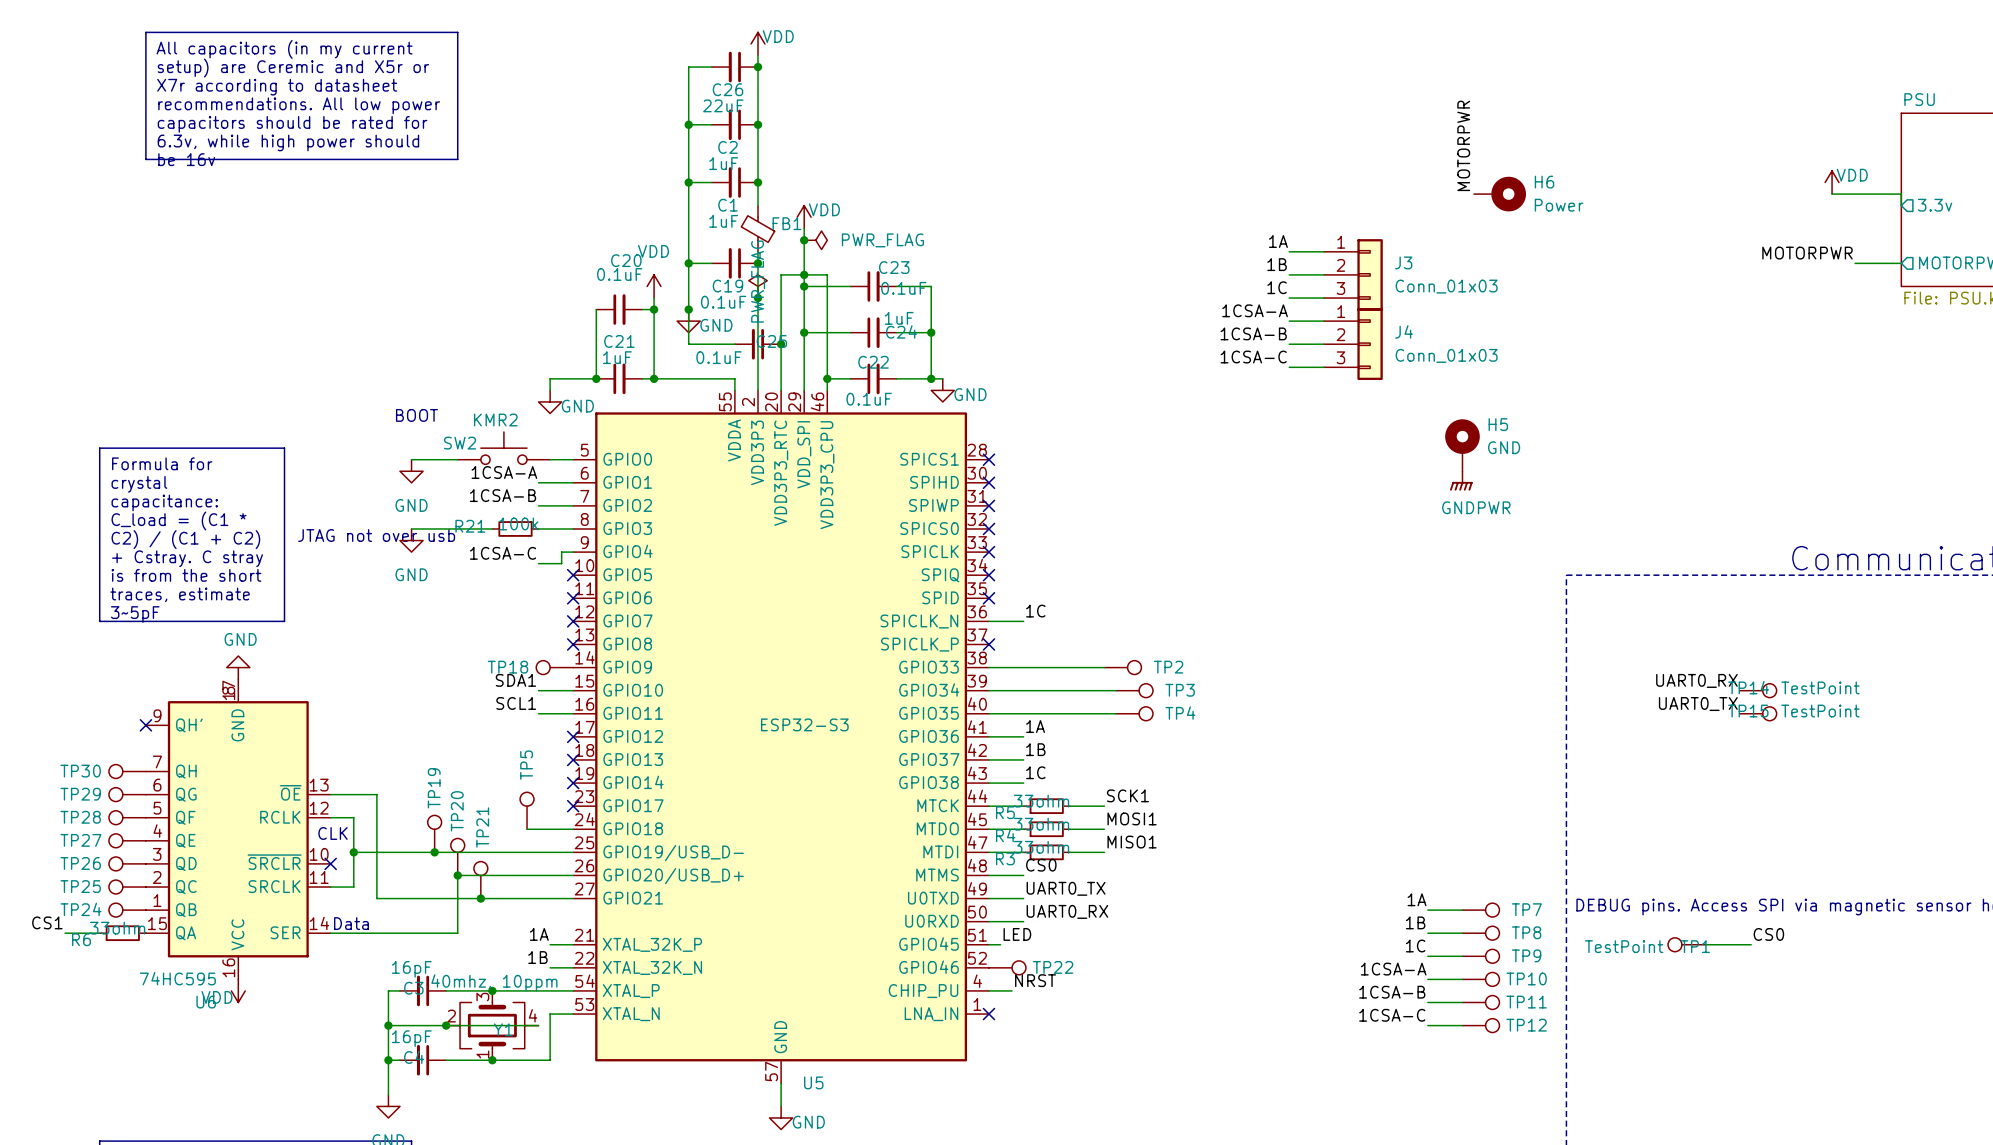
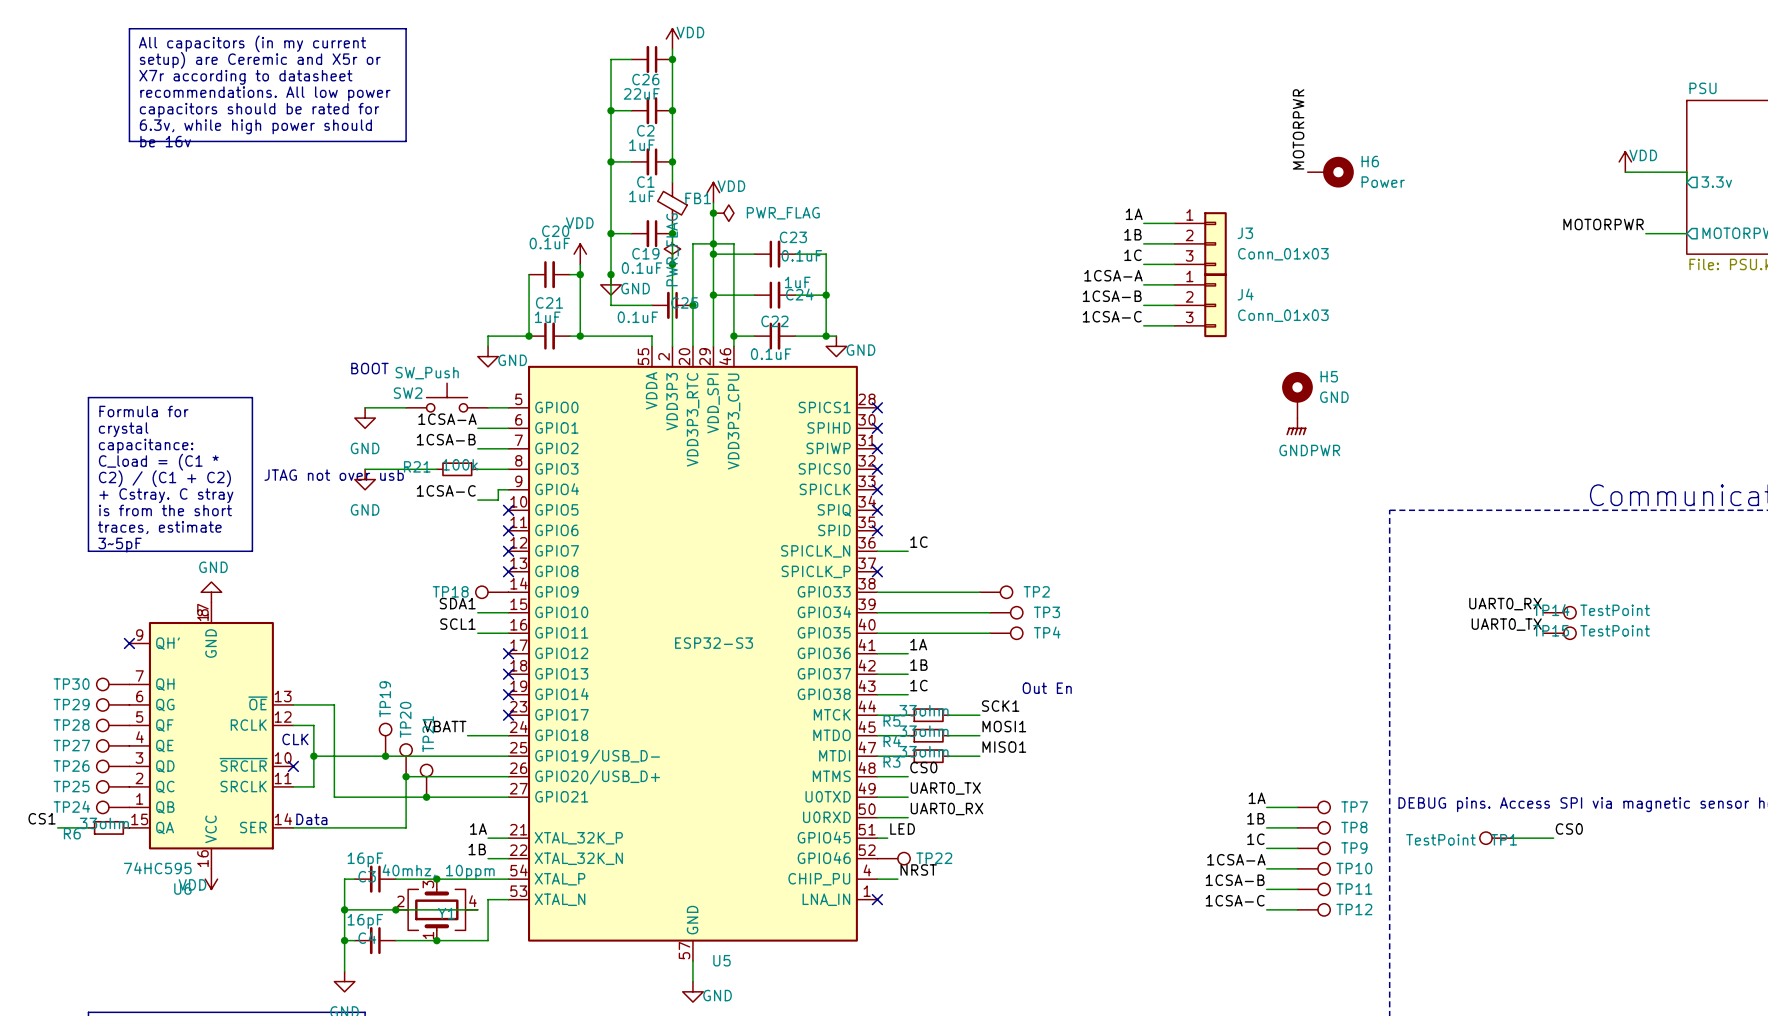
SW2 value: KMR2 (495, 420) -> SW_Push (427, 373)
text: none -> Out En (1047, 688)
TP5: (527, 810) -> none
label: none -> VBATT (445, 726)

